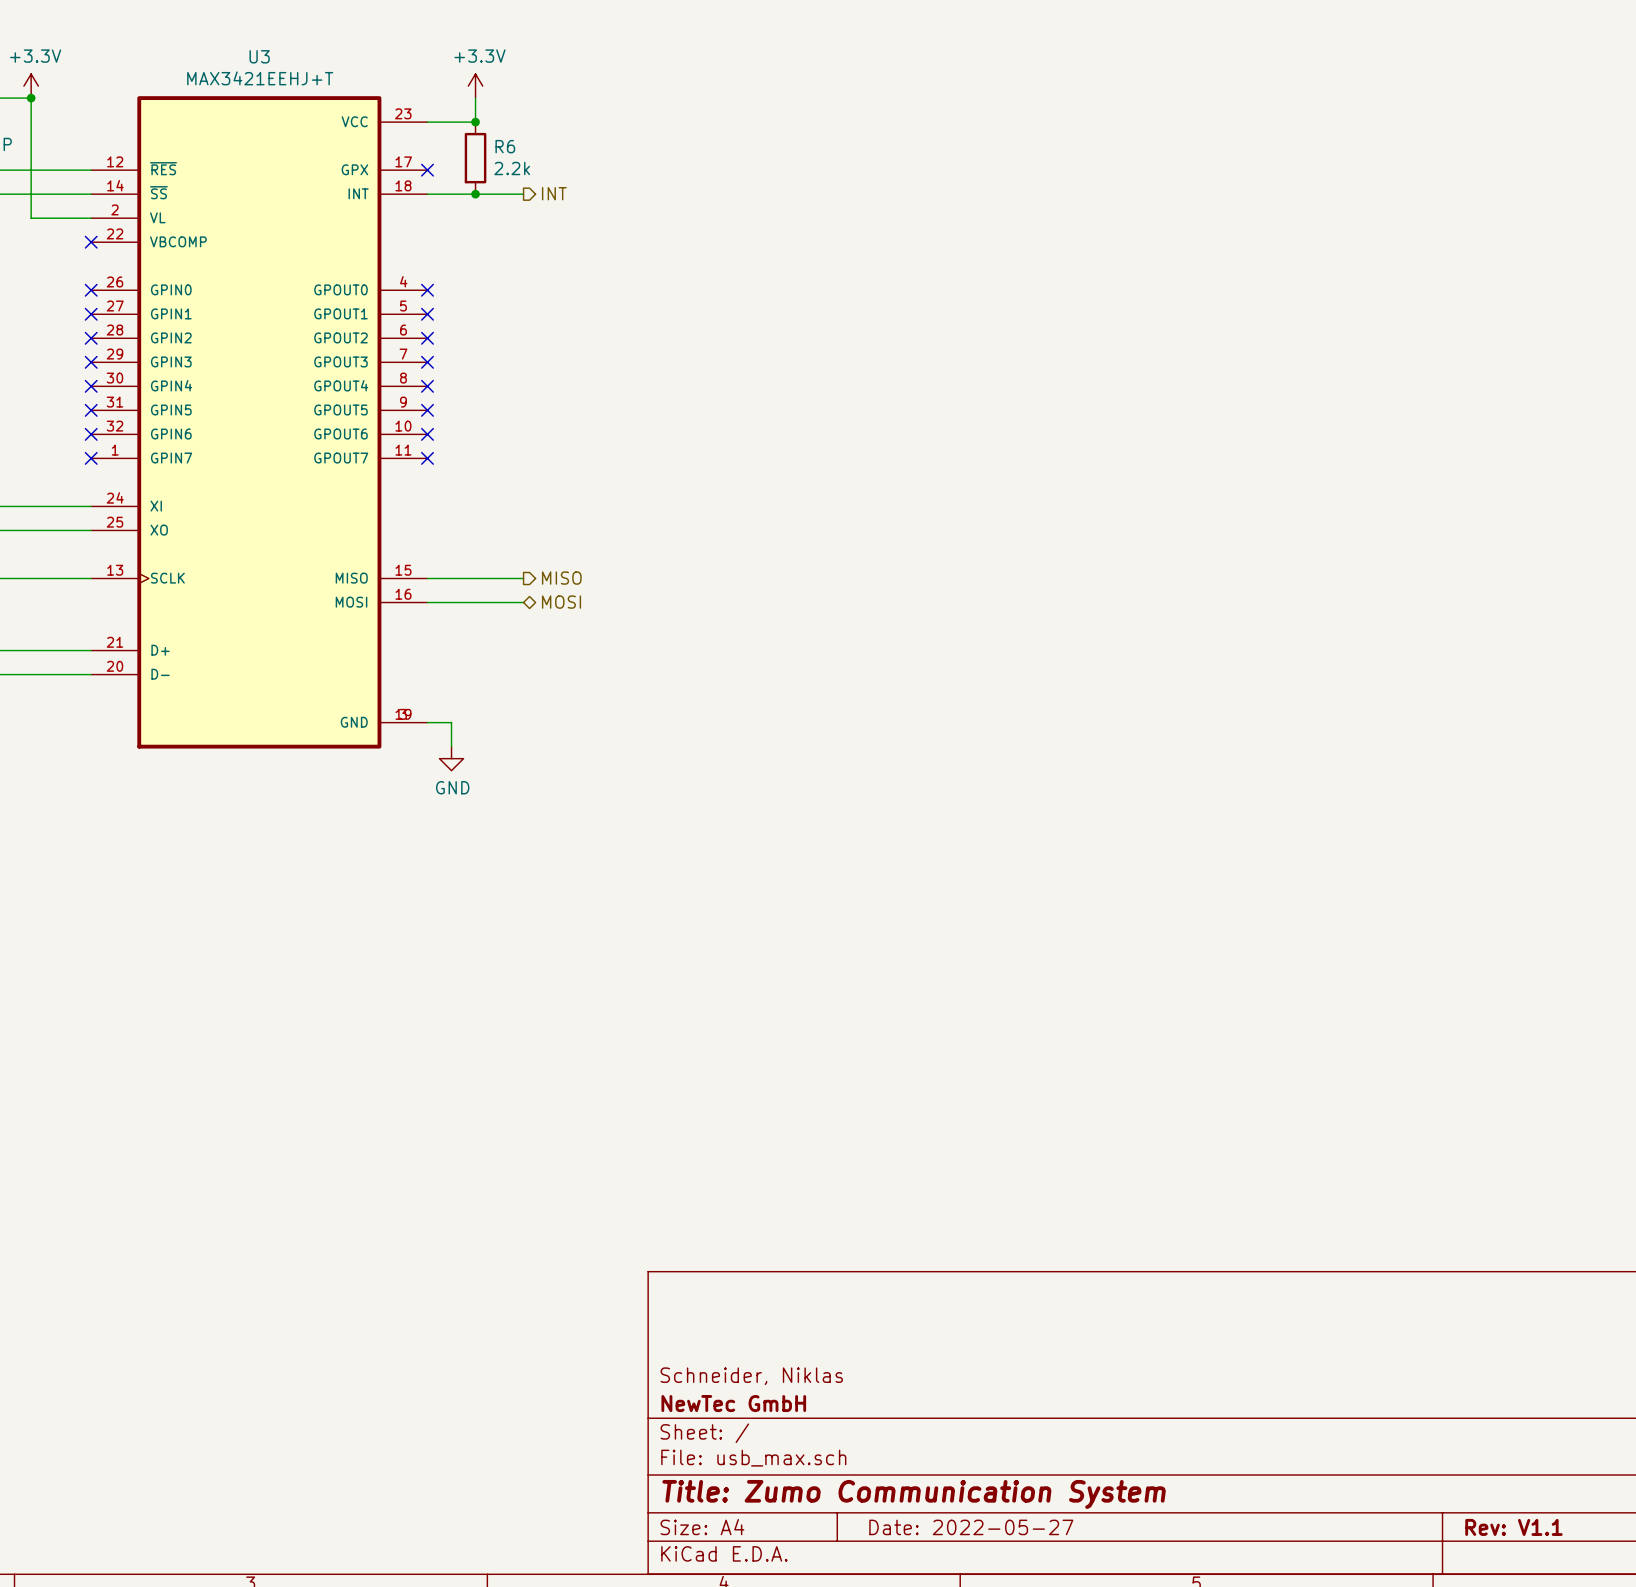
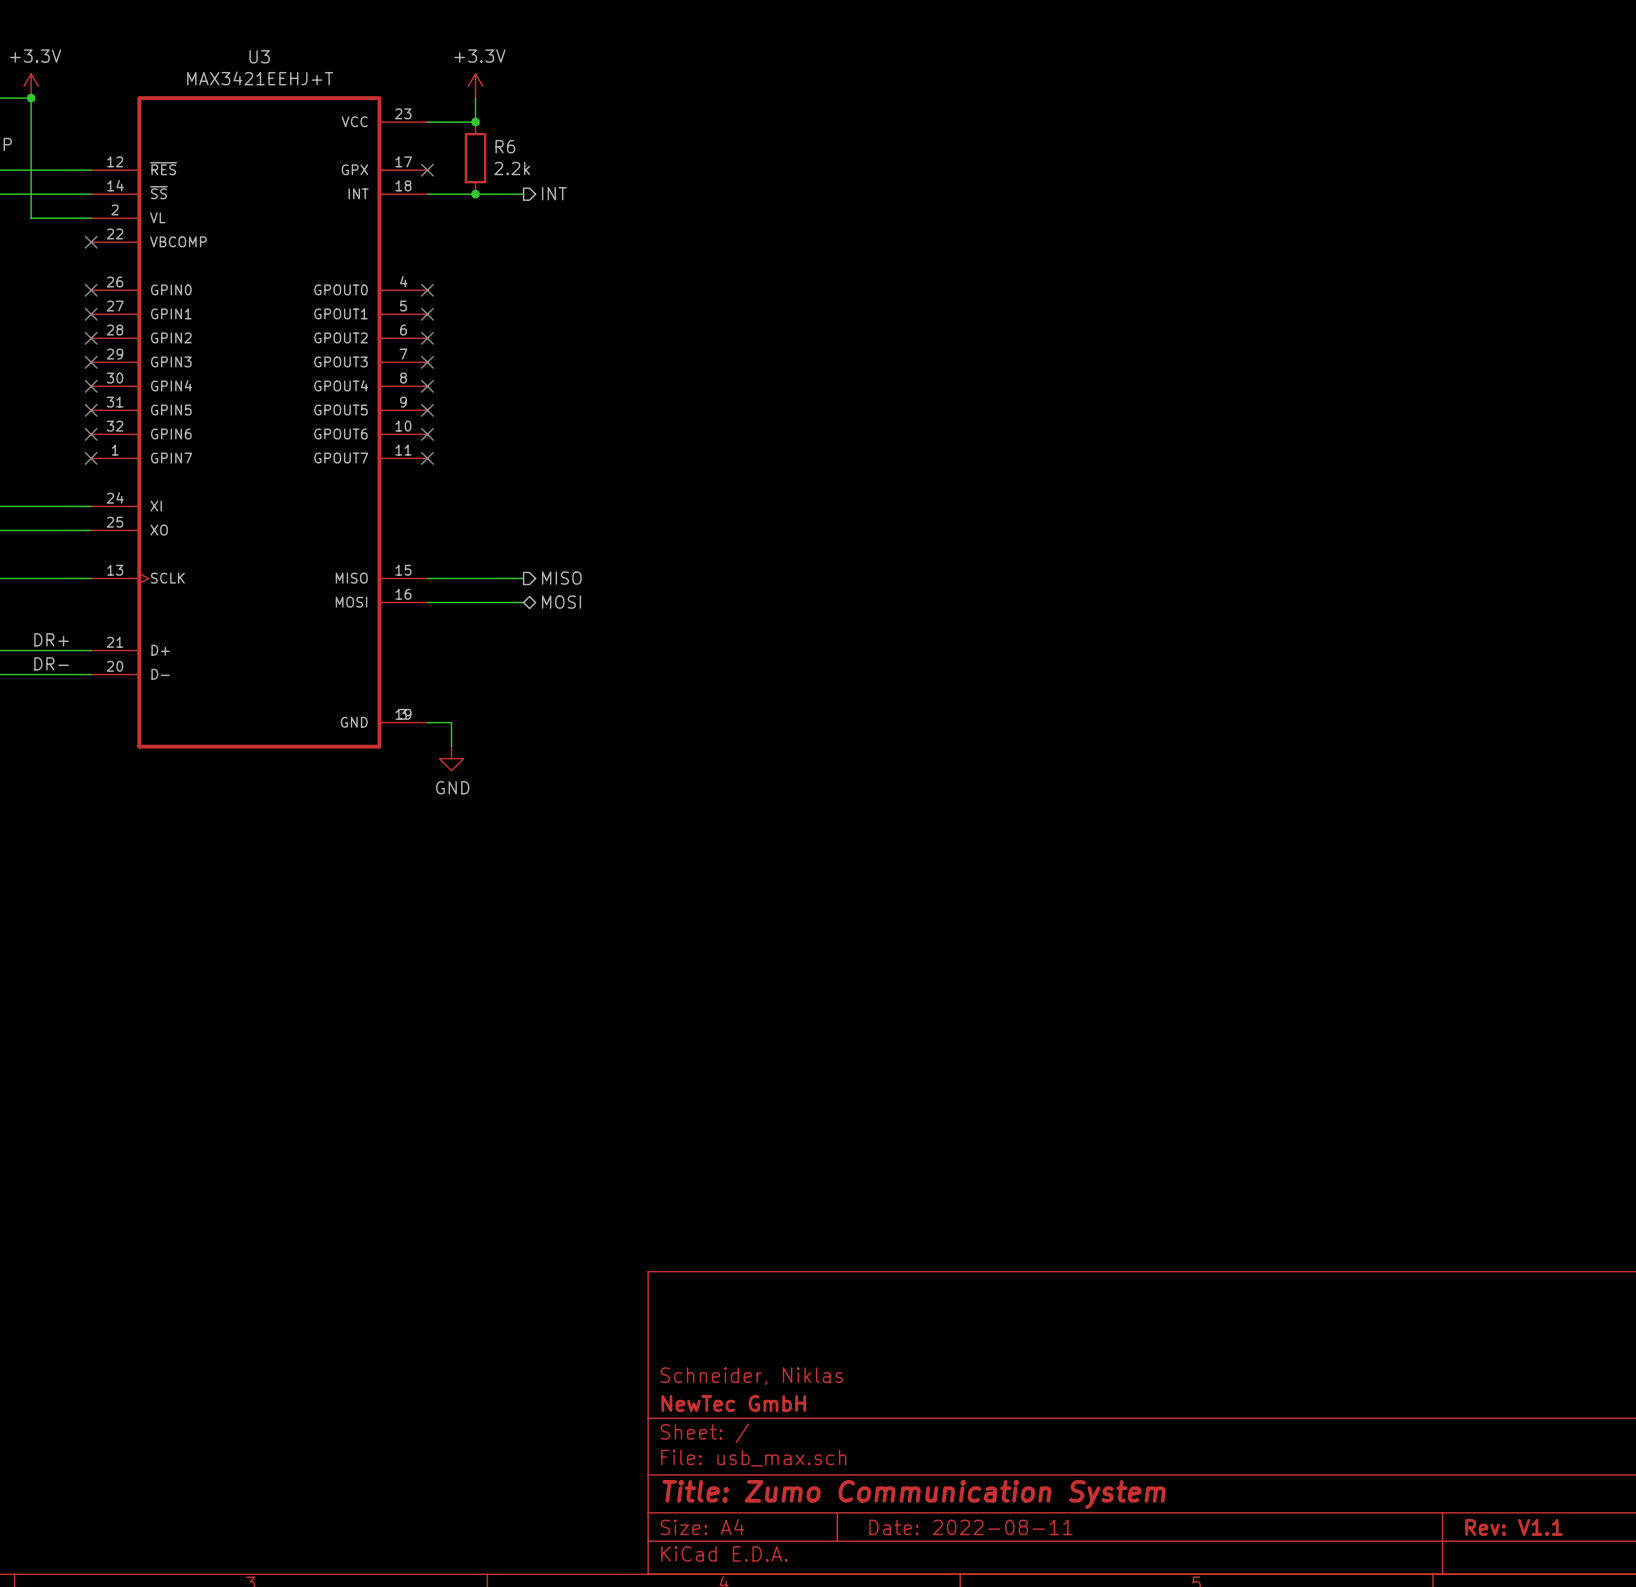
label: none -> DR+ (51, 639)
label: none -> DR- (51, 663)
title block: Date: 2022-05-27 (971, 1527) -> Date: 2022-08-11 (970, 1527)

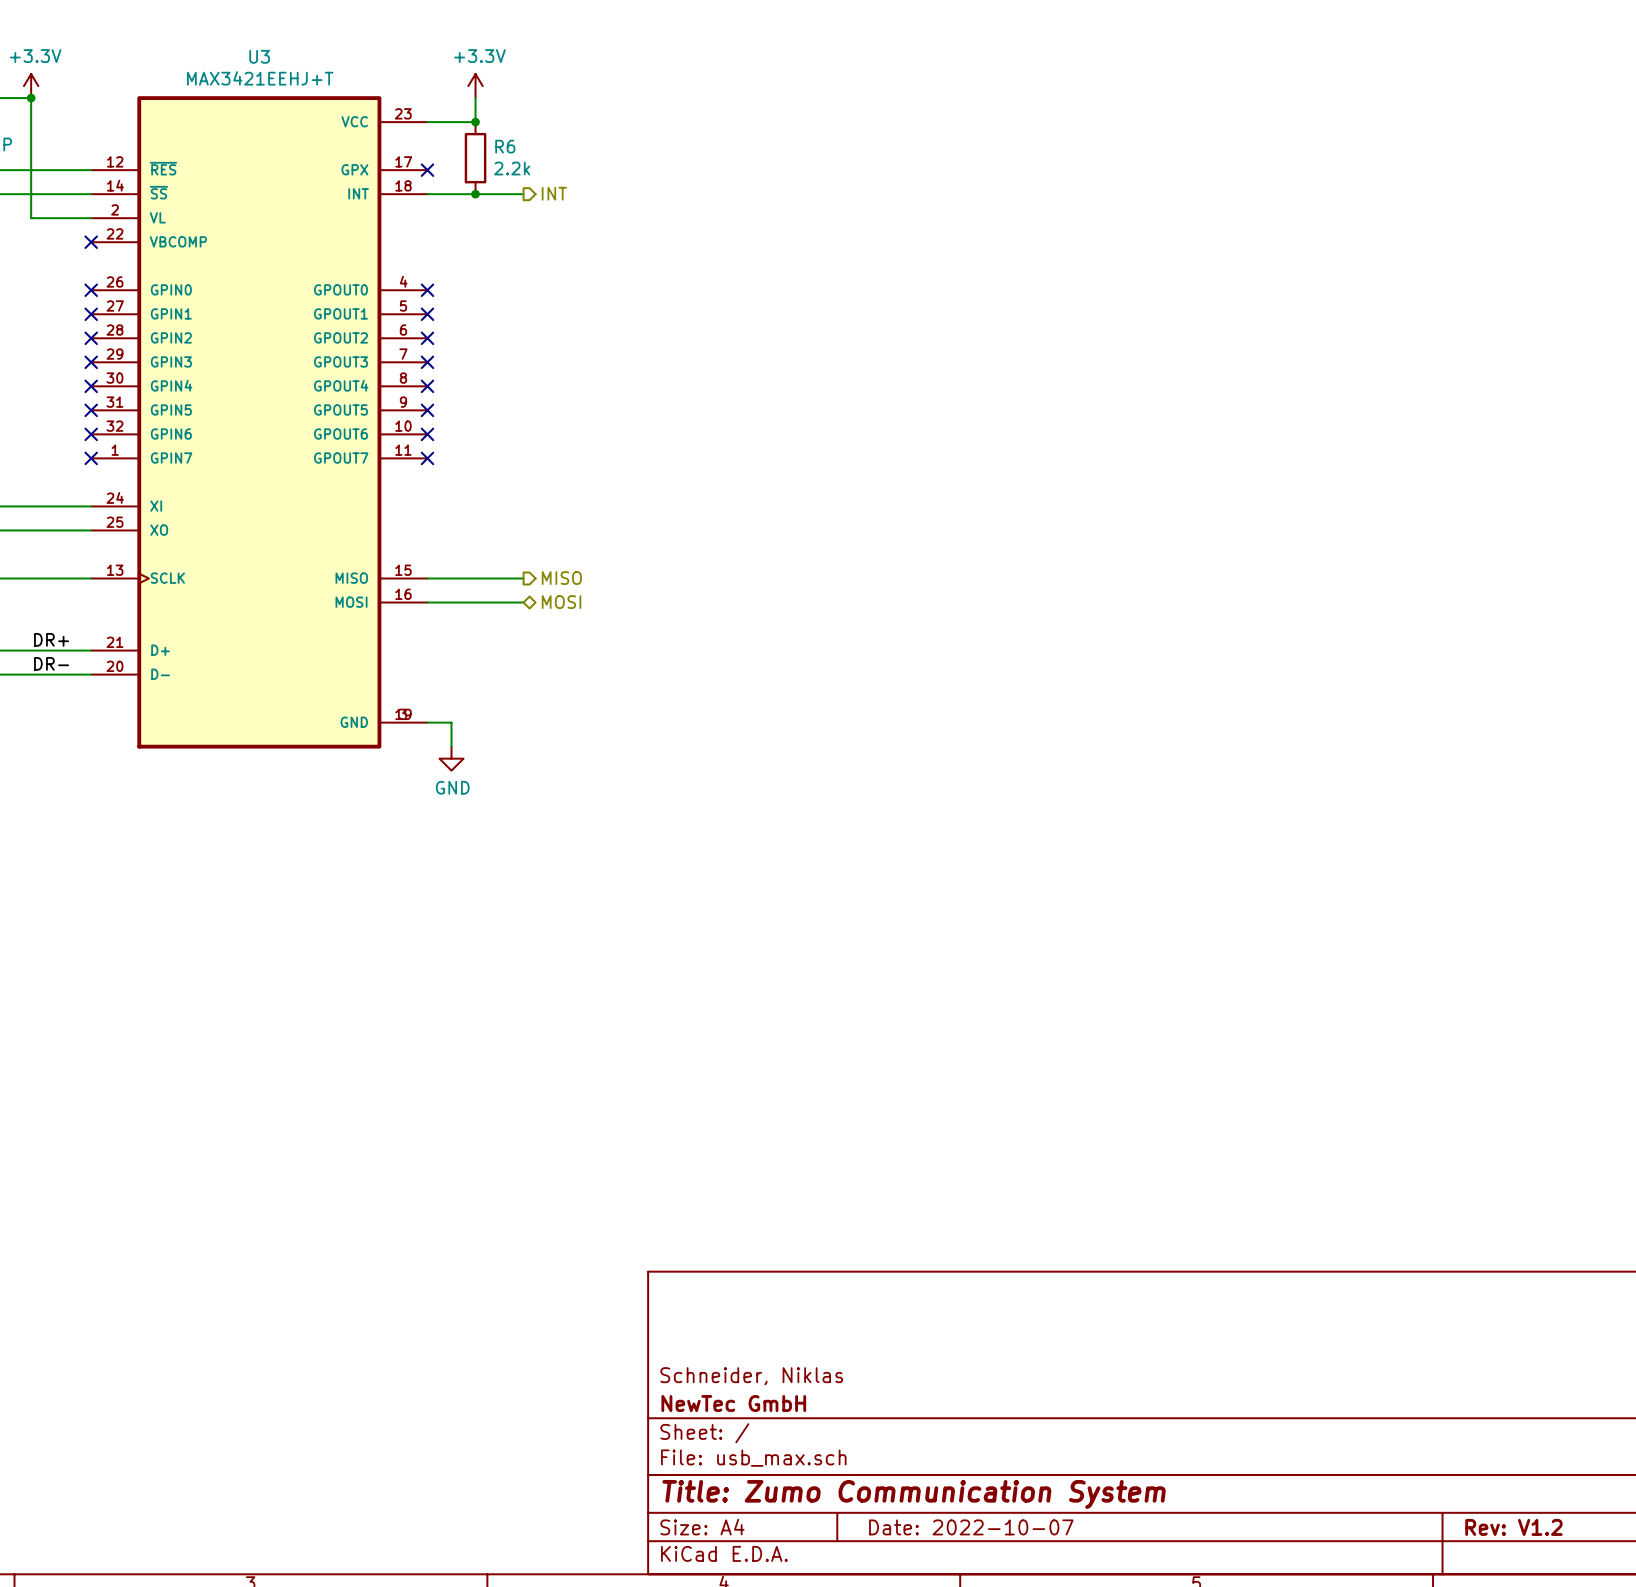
title block: Date: 2022-08-11 (970, 1527) -> Date: 2022-10-07 (971, 1527)
title block: Rev: V1.1 (1513, 1527) -> Rev: V1.2 (1513, 1527)

